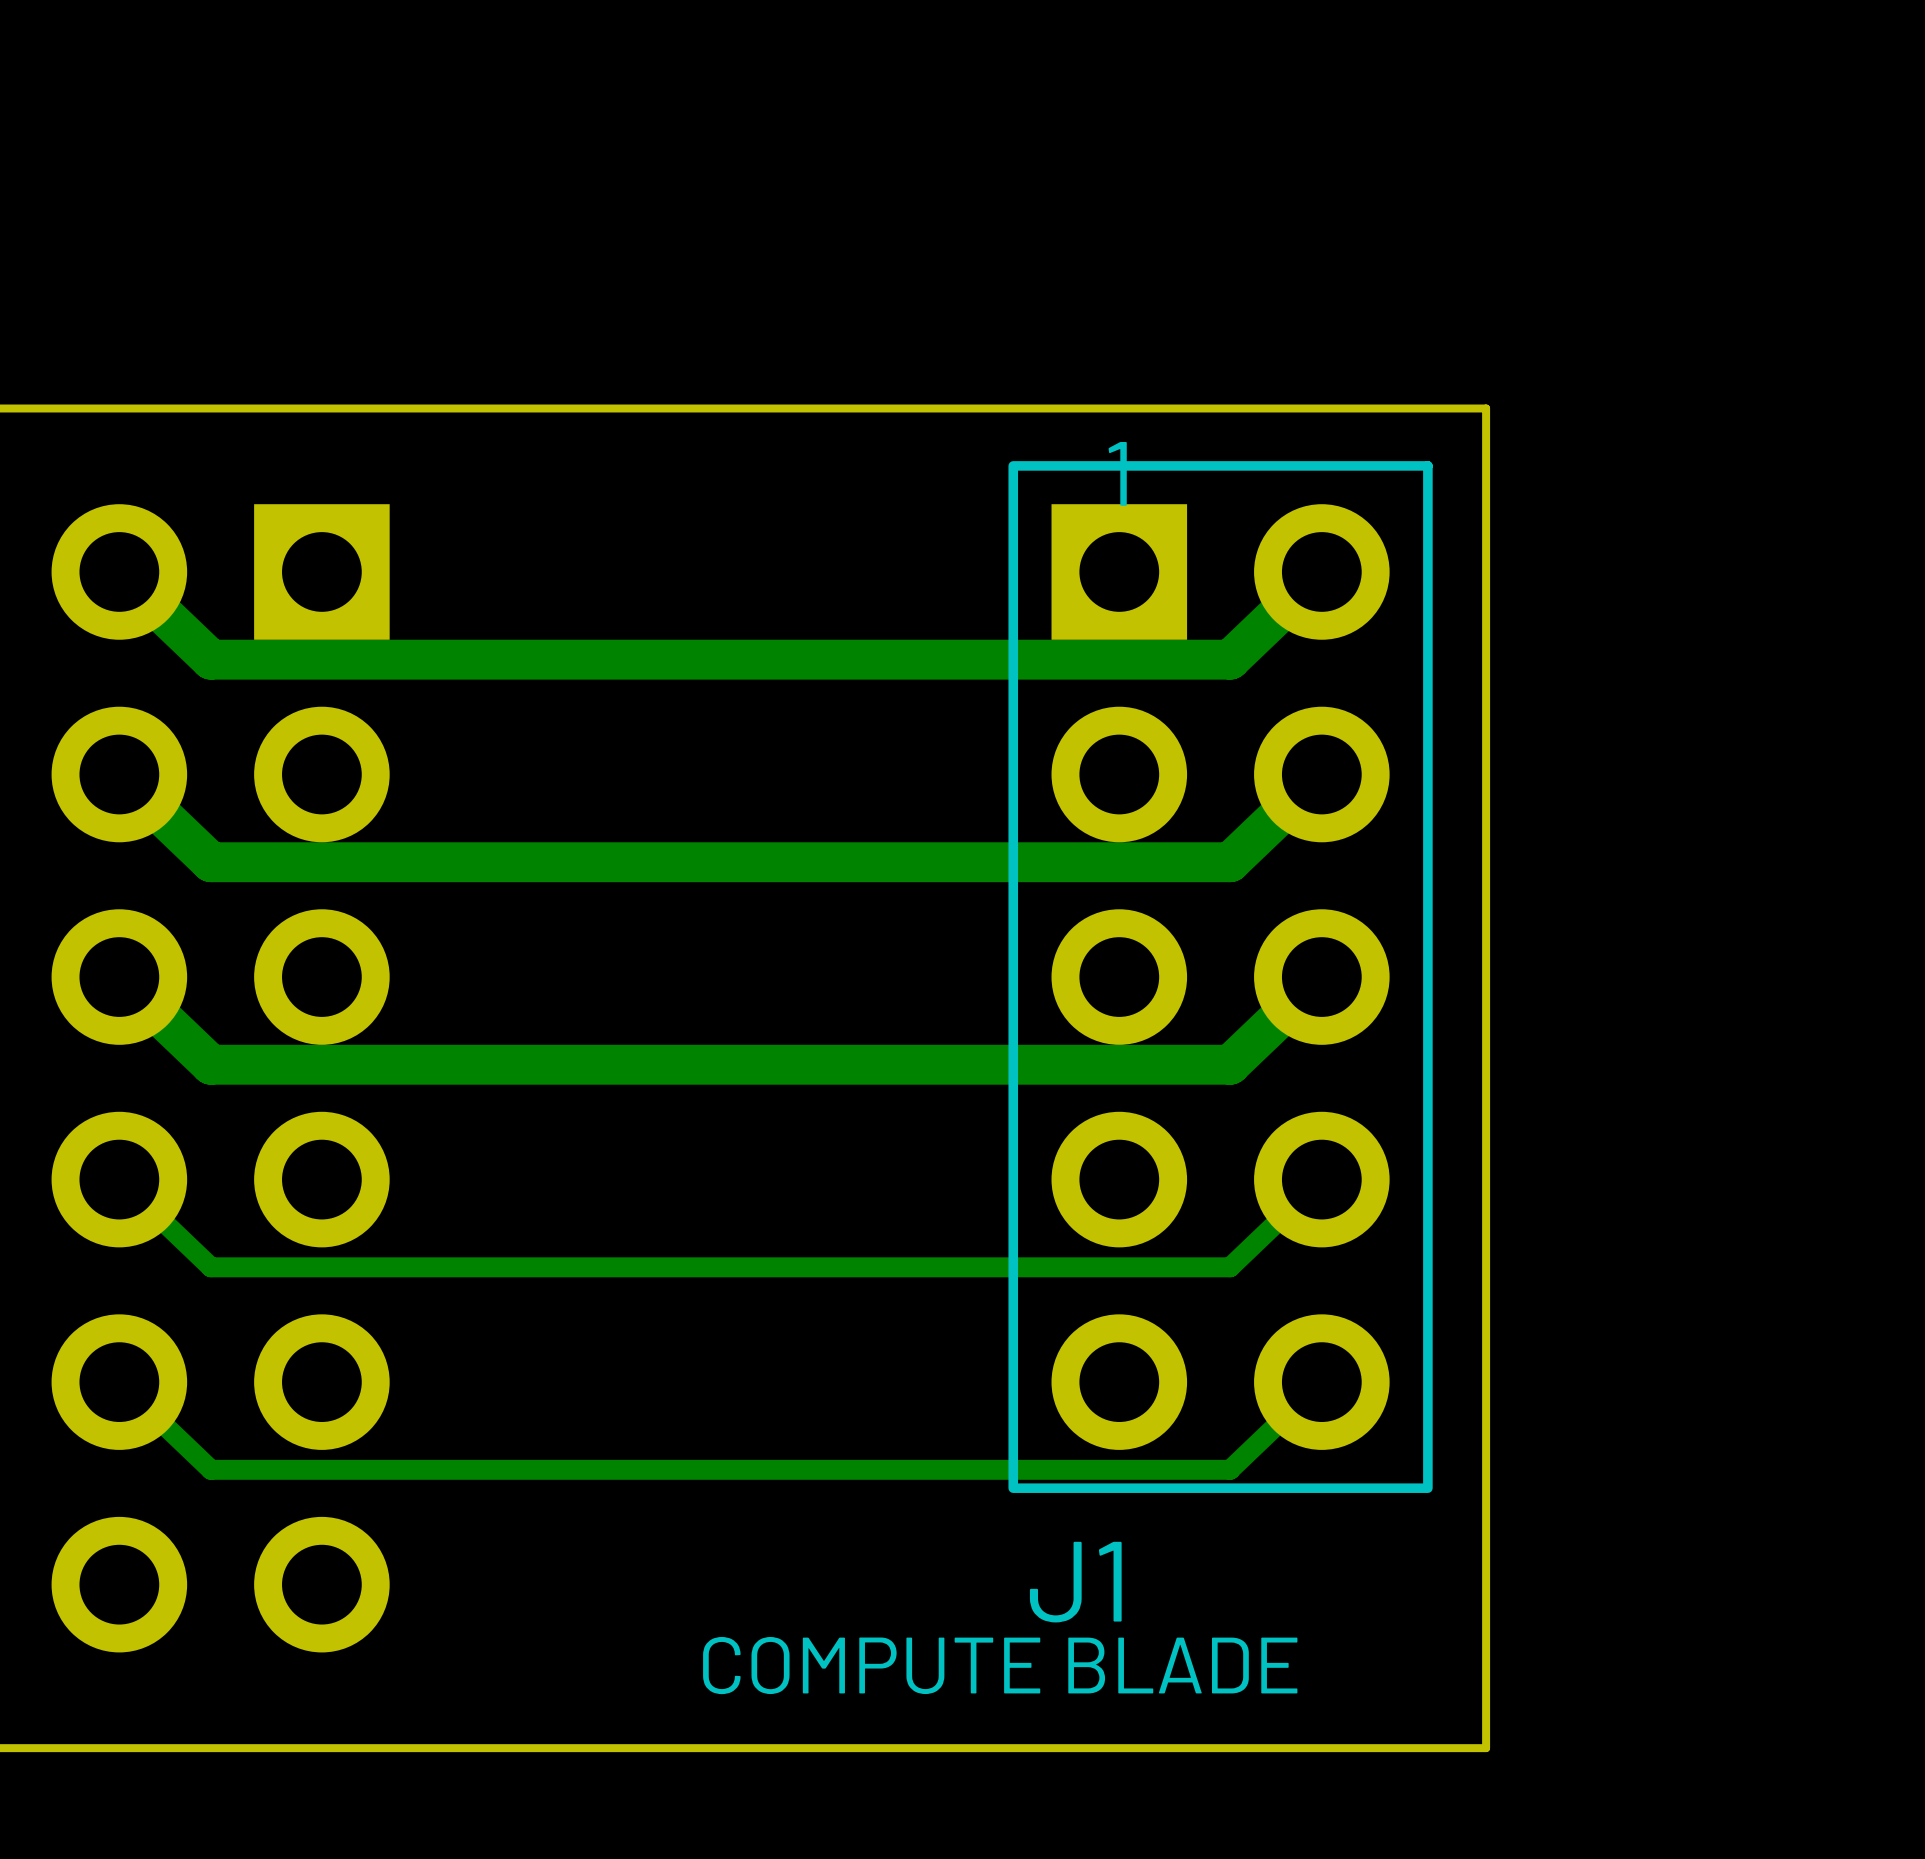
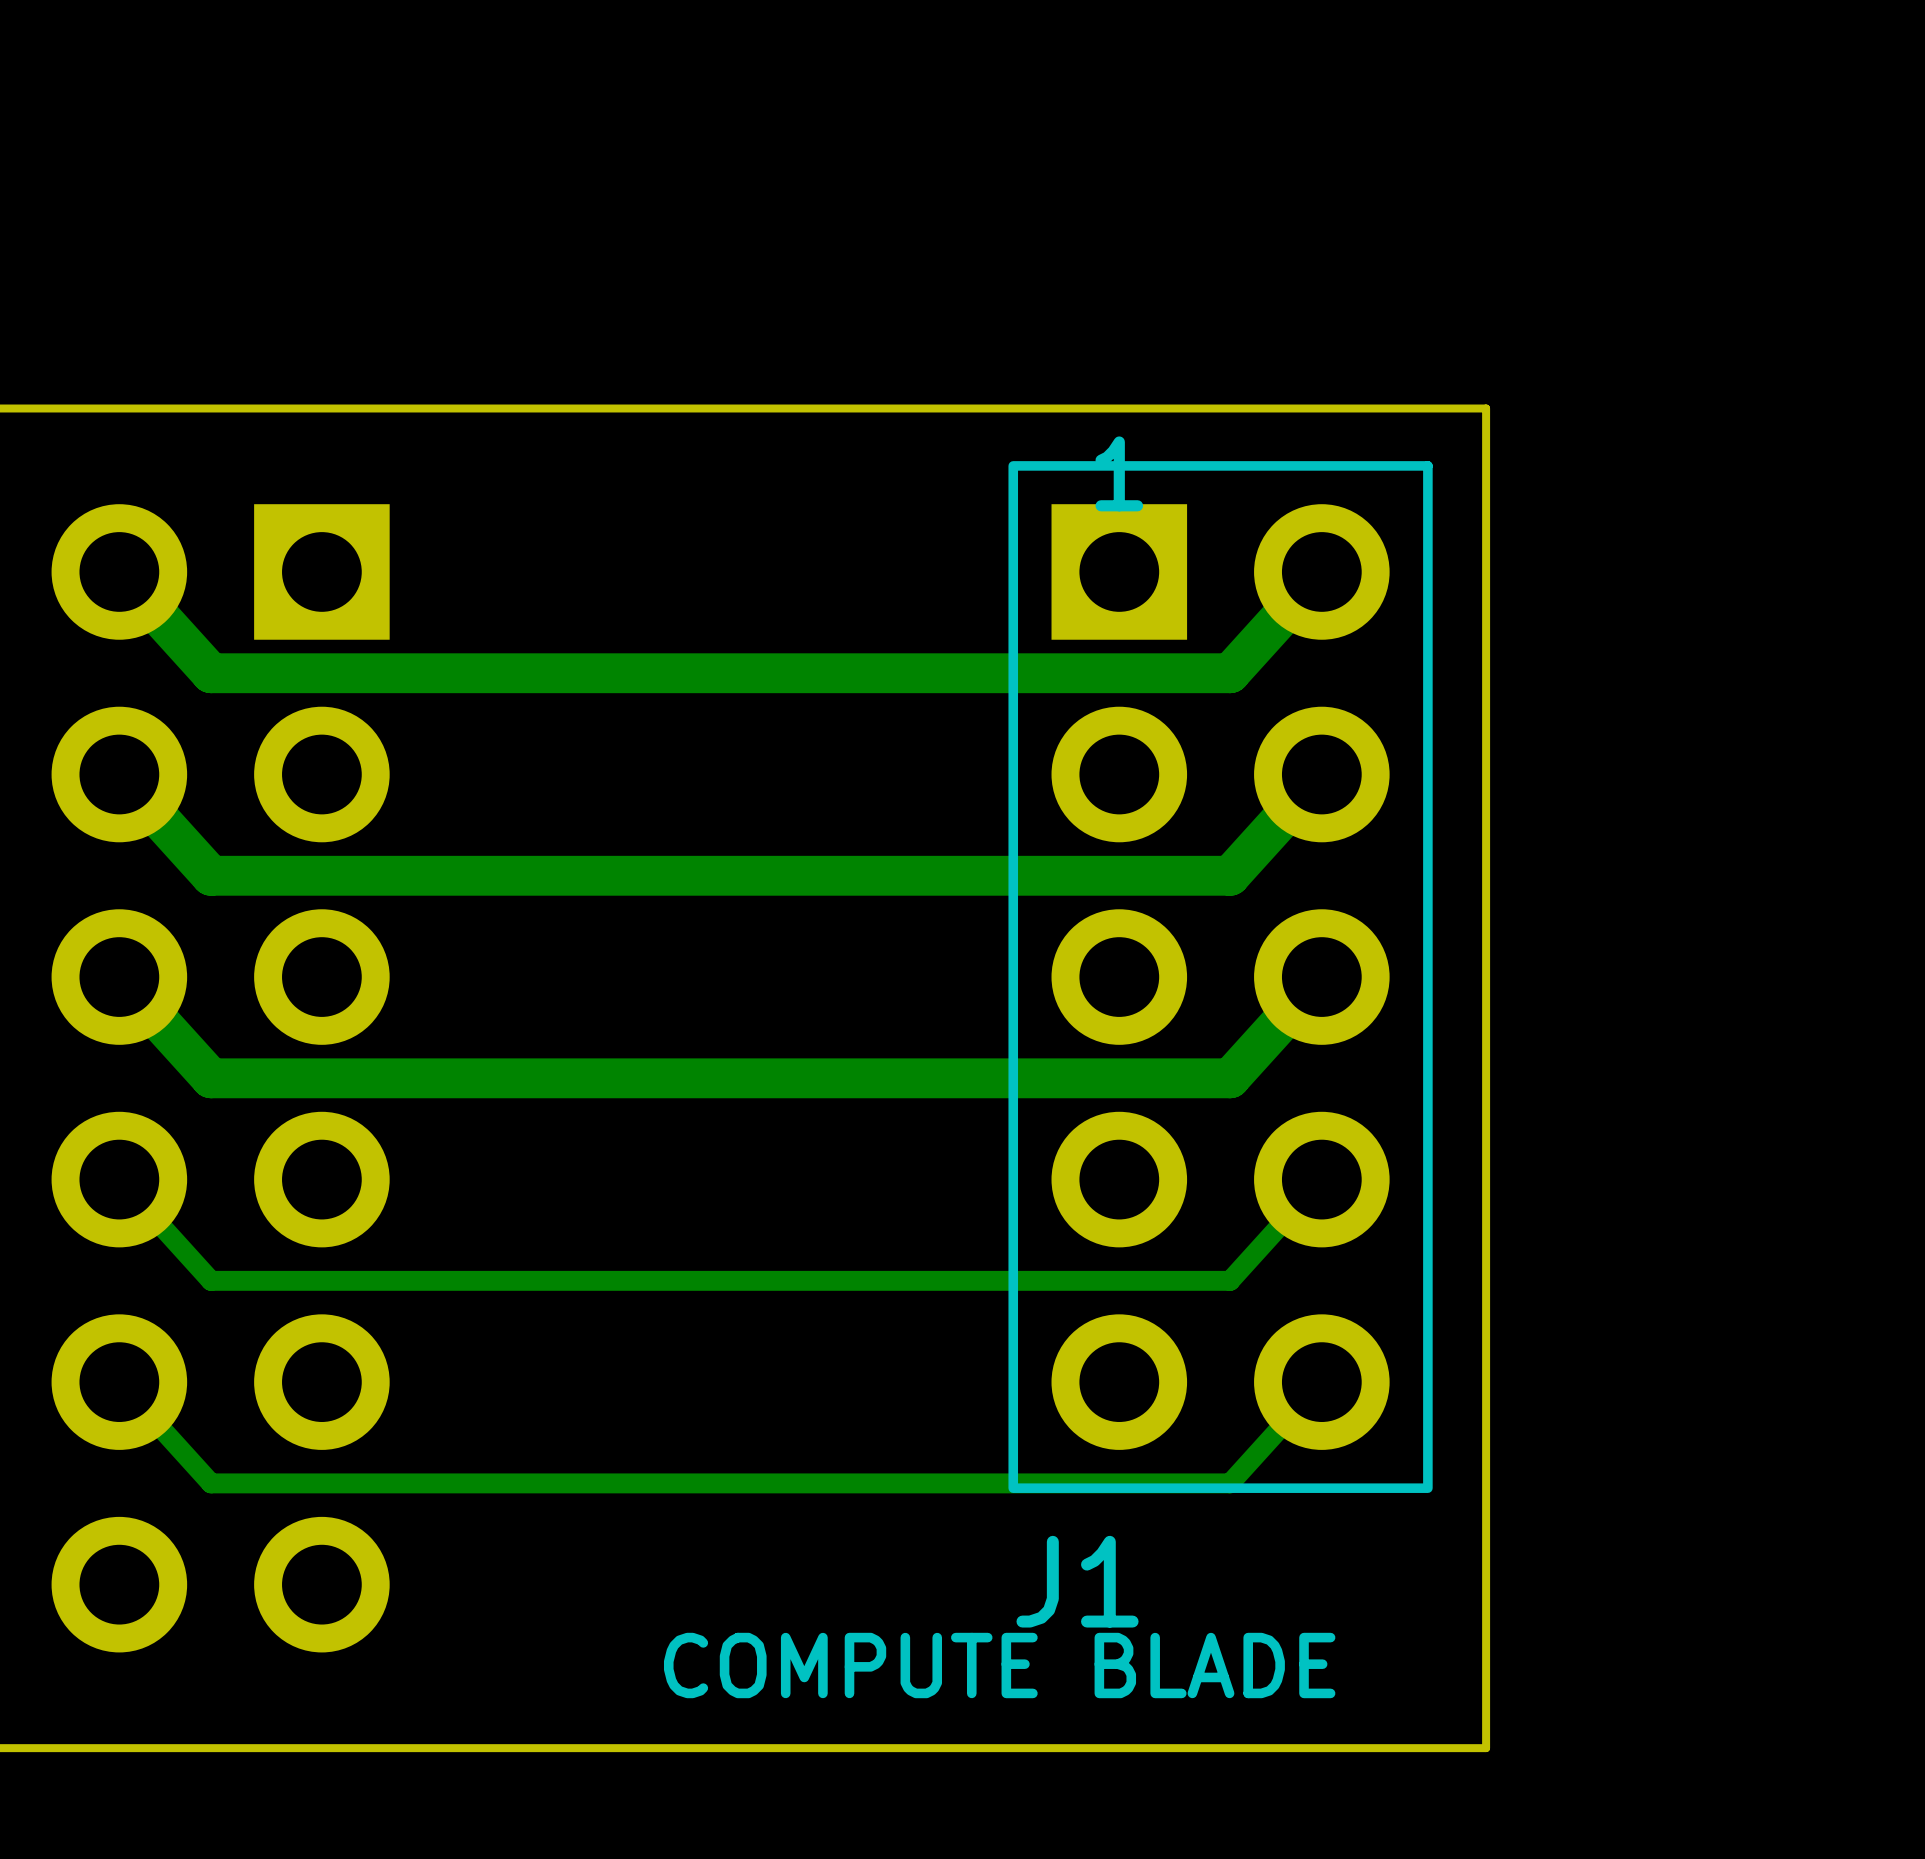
track: (1321, 571) (1230, 659) (211, 659) (119, 571) -> (1321, 571) (1230, 673) (211, 673) (119, 571)
track: (1321, 774) (1230, 862) (211, 862) (119, 774) -> (1321, 774) (1230, 875) (211, 875) (119, 774)
track: (1321, 977) (1230, 1064) (211, 1064) (119, 977) -> (1321, 977) (1230, 1078) (211, 1078) (119, 977)
track: (1321, 1179) (1230, 1267) (211, 1267) (119, 1179) -> (1321, 1179) (1230, 1280) (211, 1280) (119, 1179)
track: (1321, 1382) (1230, 1469) (211, 1469) (119, 1382) -> (1321, 1382) (1230, 1483) (211, 1483) (119, 1382)

